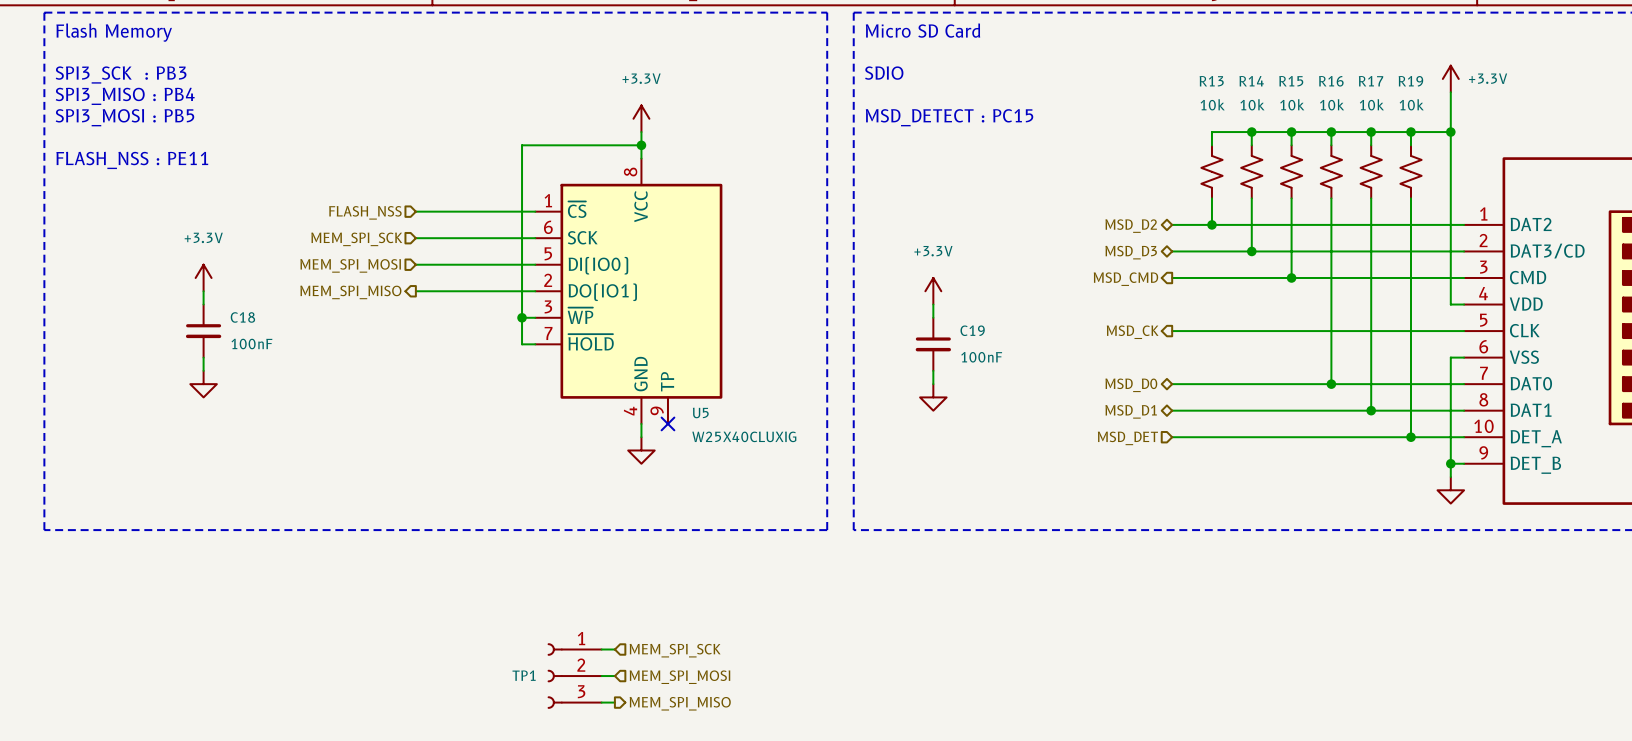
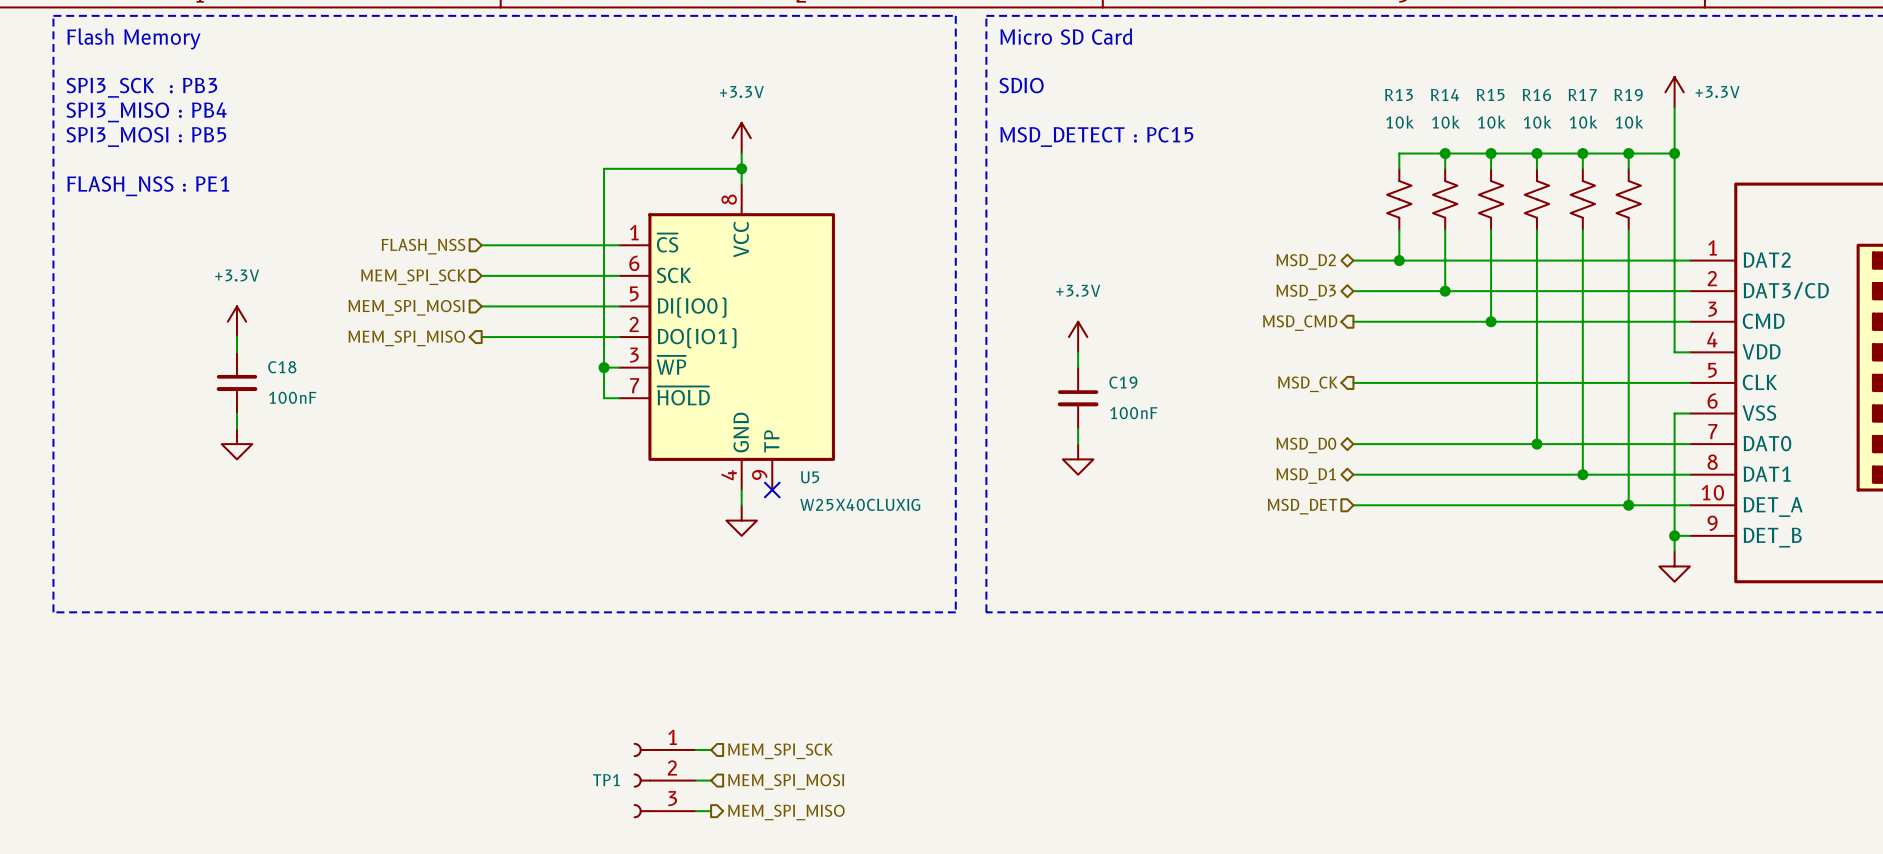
text: FLASH_NSS : PE11 (132, 160) -> FLASH_NSS : PE1 (148, 186)

